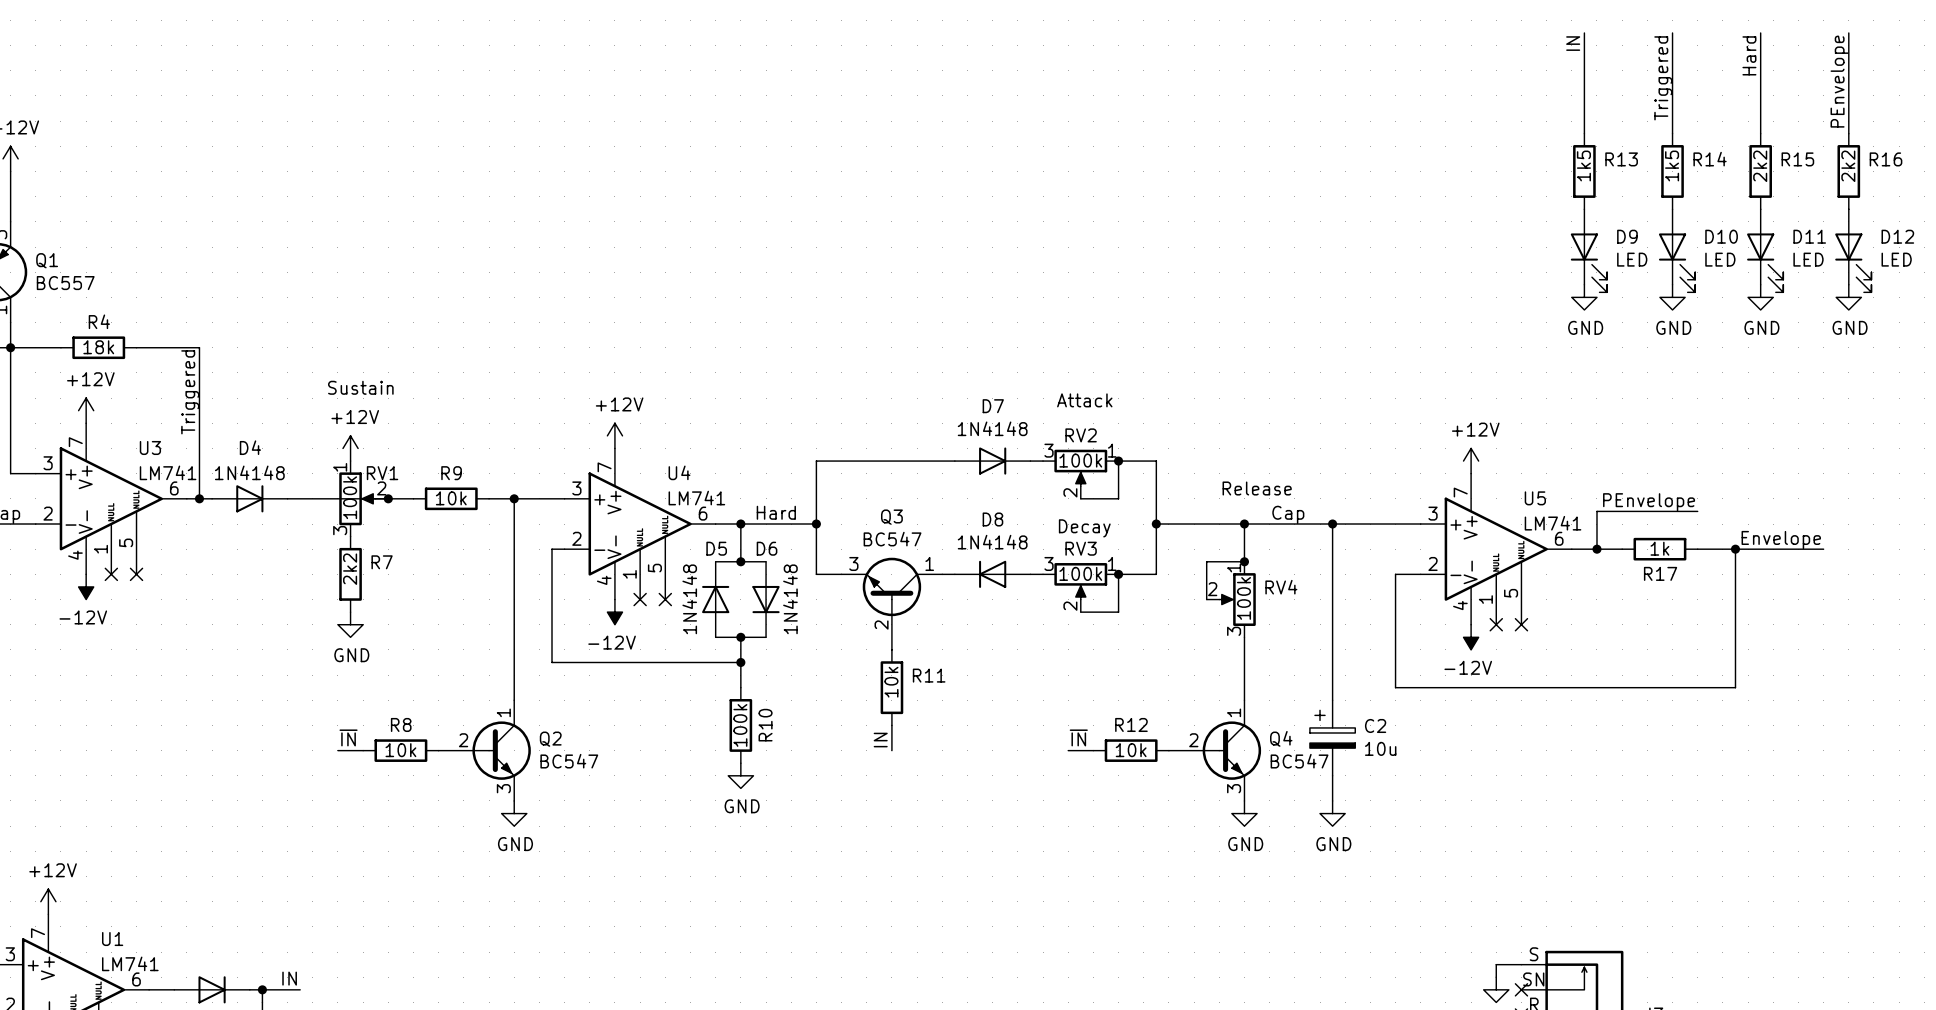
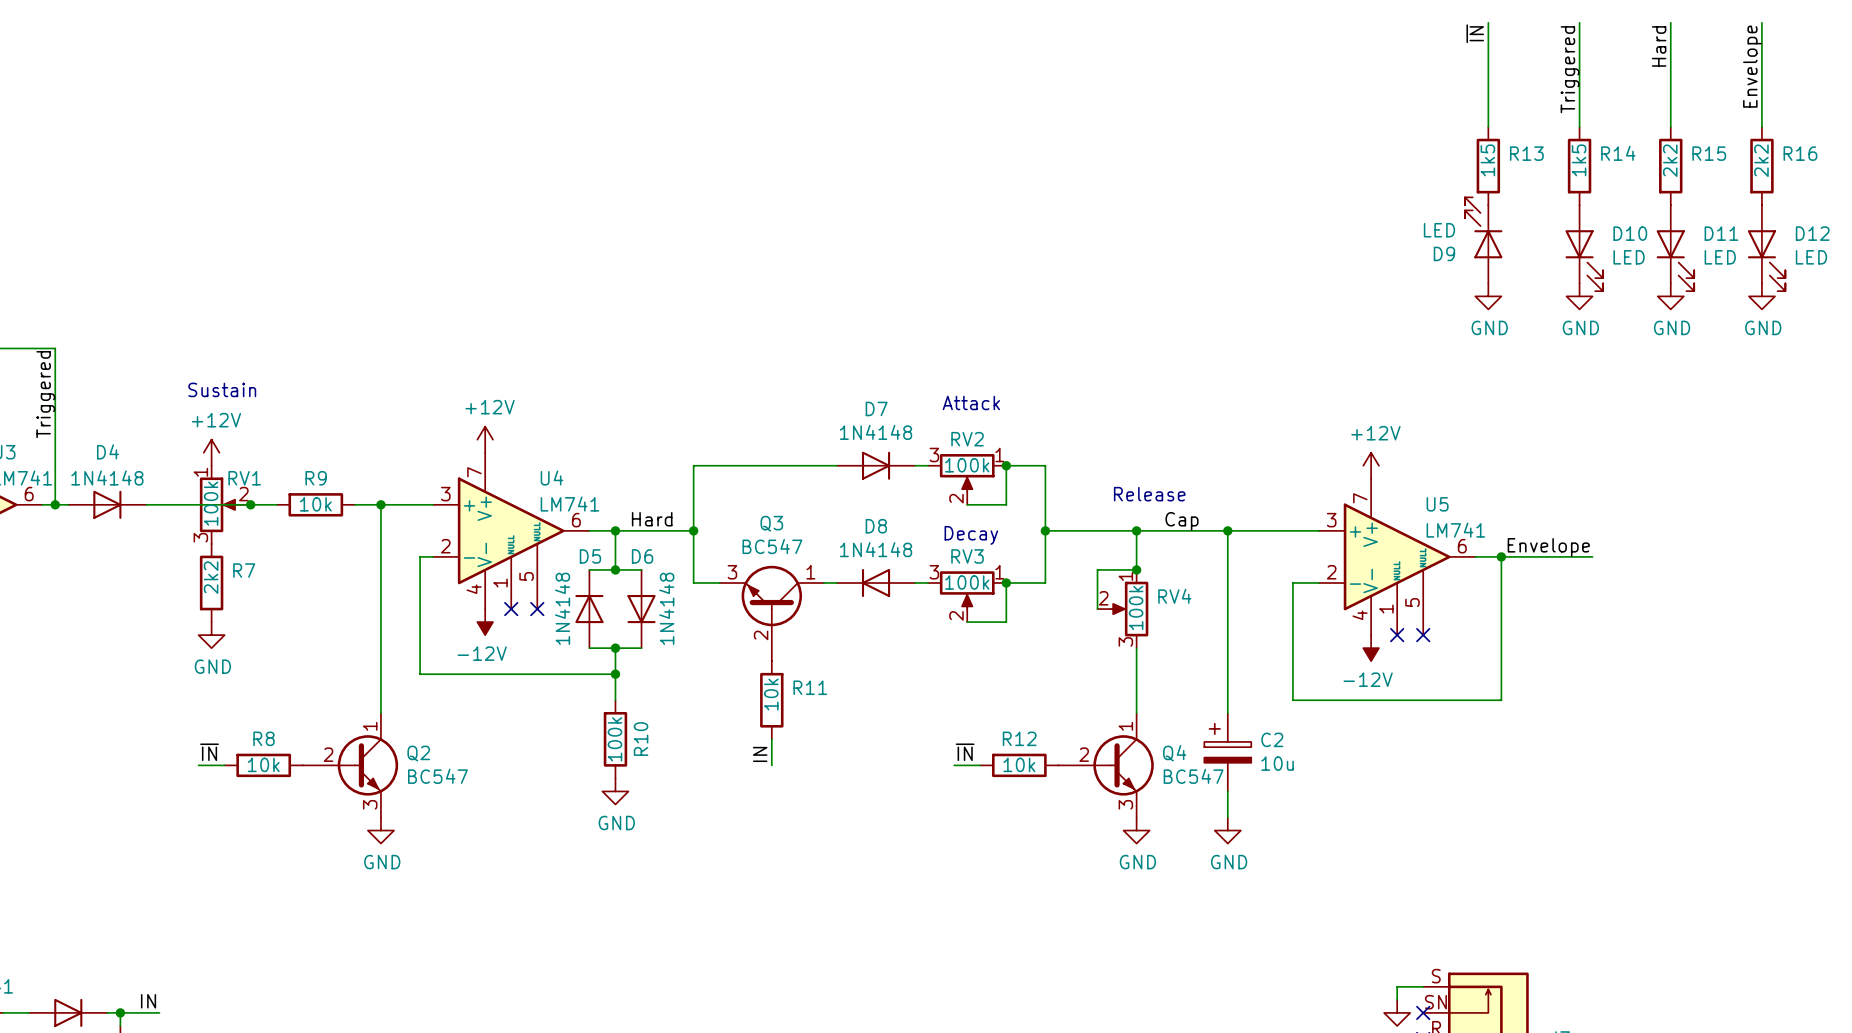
label: IN (1573, 43) -> ~{IN} (1475, 33)
label: PEnvelope (1839, 81) -> Envelope (1752, 66)
D9 rotation: 0° (1588, 262) -> 180° (1483, 227)
label: PEnvelope (1649, 502) -> none
wire: (1697, 511) (1596, 511) (1596, 549) -> none
label position: Envelope (1781, 540) -> Envelope (1548, 547)
wire: none -> (1527, 556) (1592, 556)
R17: 1k (1659, 549) -> none
wire: (1697, 549) (1823, 549) -> none
wire: (1735, 549) (1735, 687) (1596, 687) -> (1501, 556) (1501, 700)
junction: (1735, 549) -> none

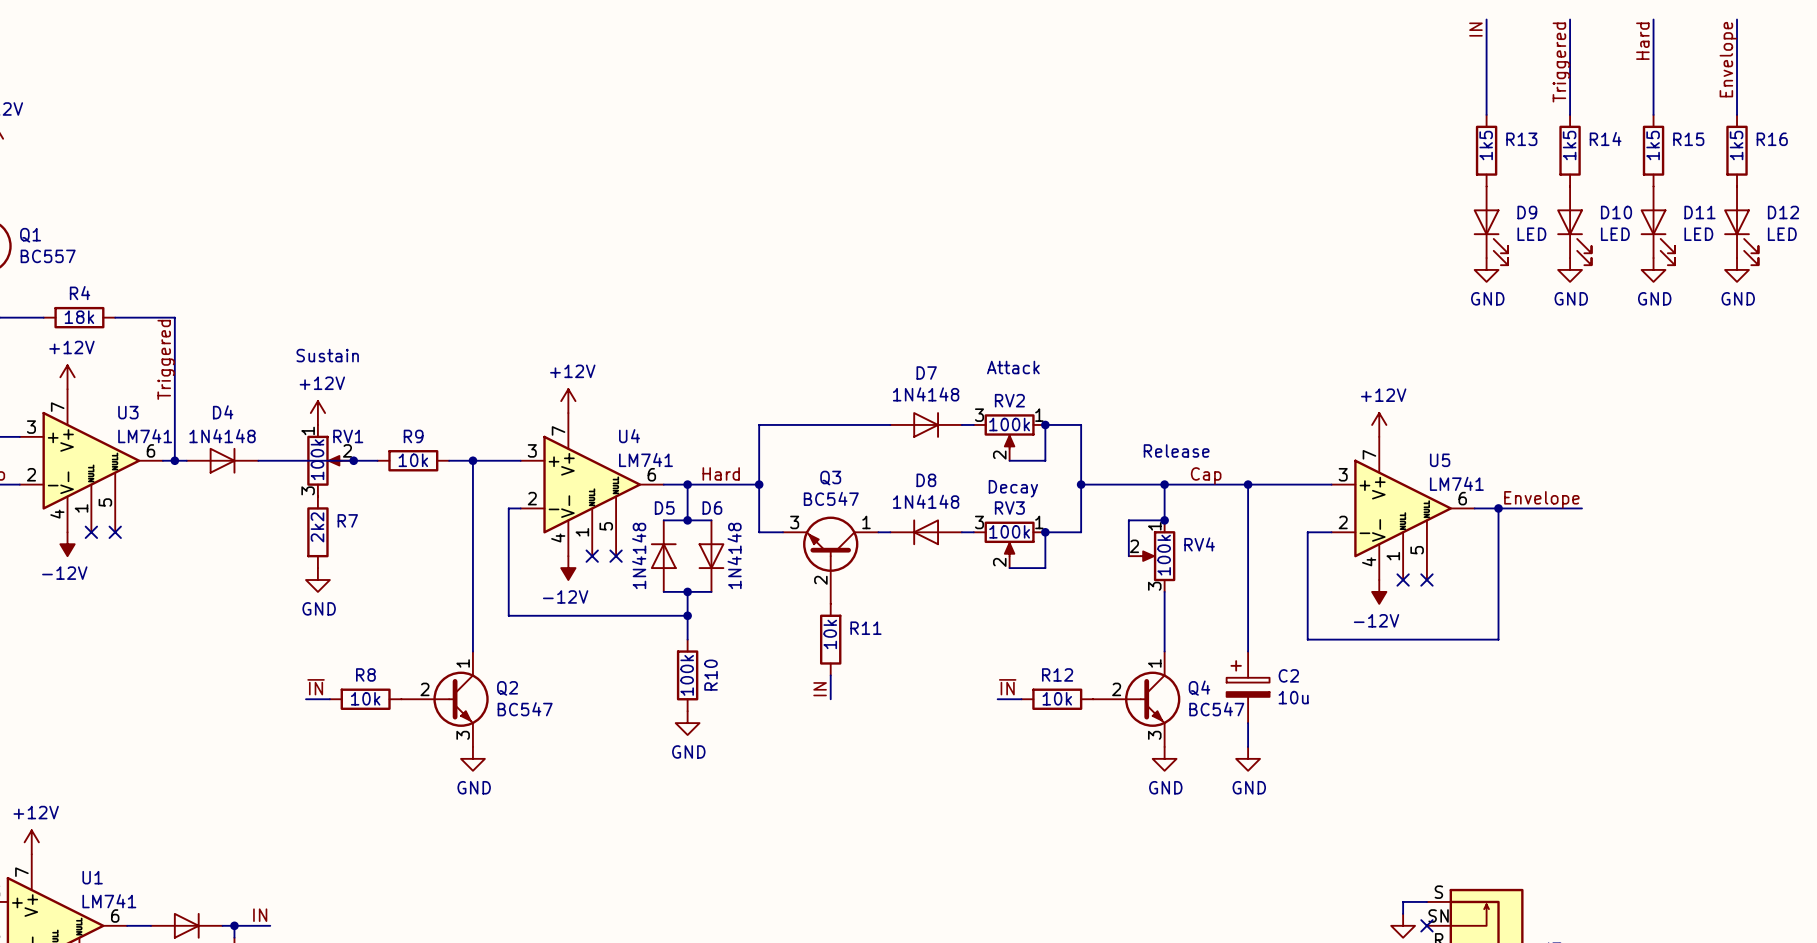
label: ~{IN} (1475, 33) -> IN (1475, 29)
R15 value: 2k2 (1670, 160) -> 1k5 (1653, 145)
R16 value: 2k2 (1761, 160) -> 1k5 (1736, 145)
D9 rotation: 0° (1483, 227) -> 180° (1490, 237)

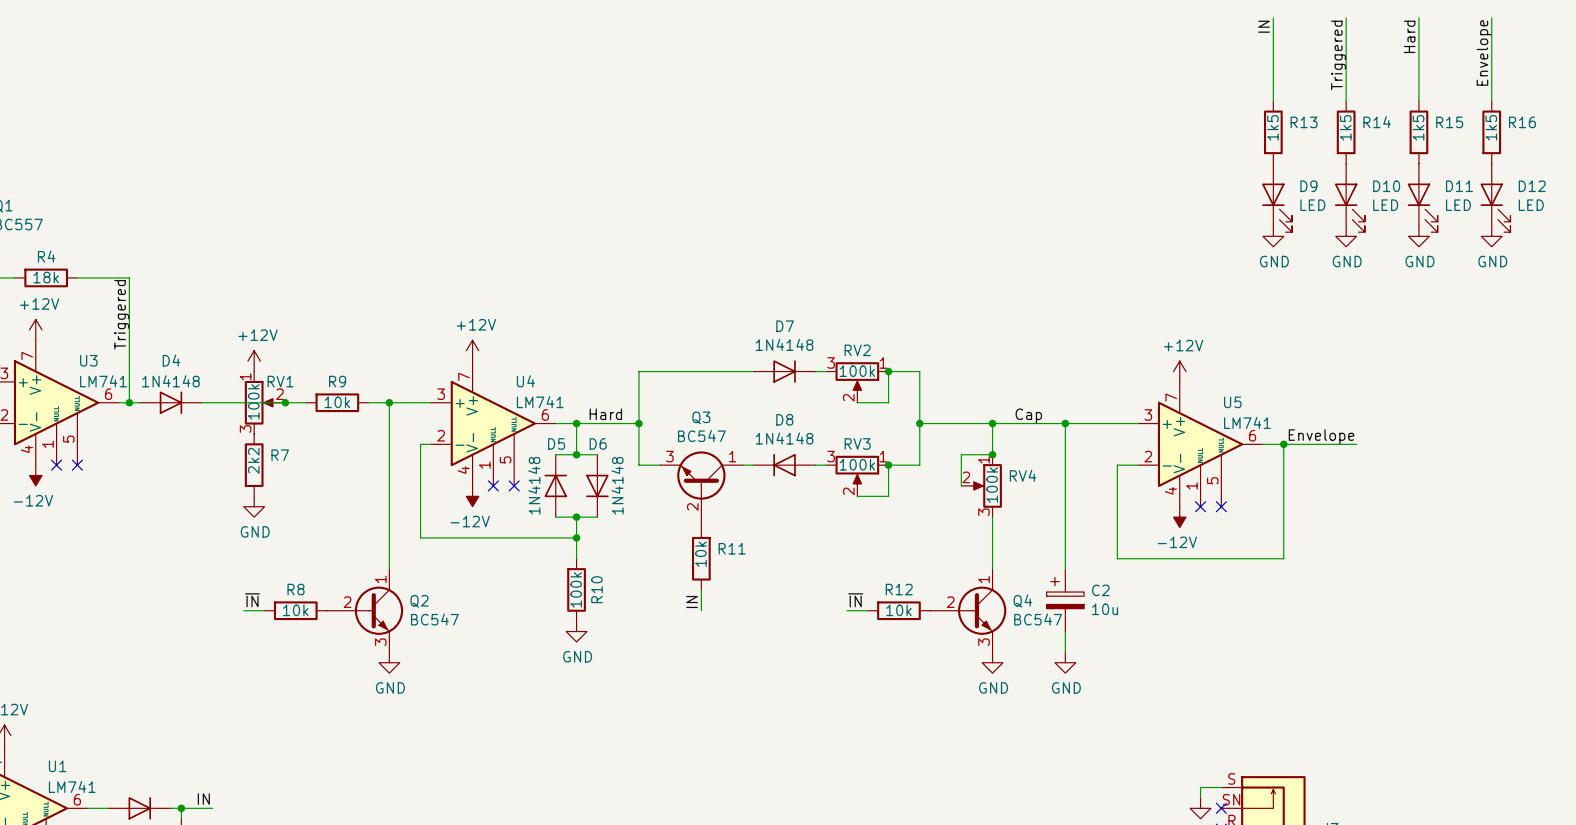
text: Sustain (327, 355) -> none
text: Attack (1013, 367) -> none
text: Release (1176, 450) -> none
text: Decay (1013, 488) -> none

